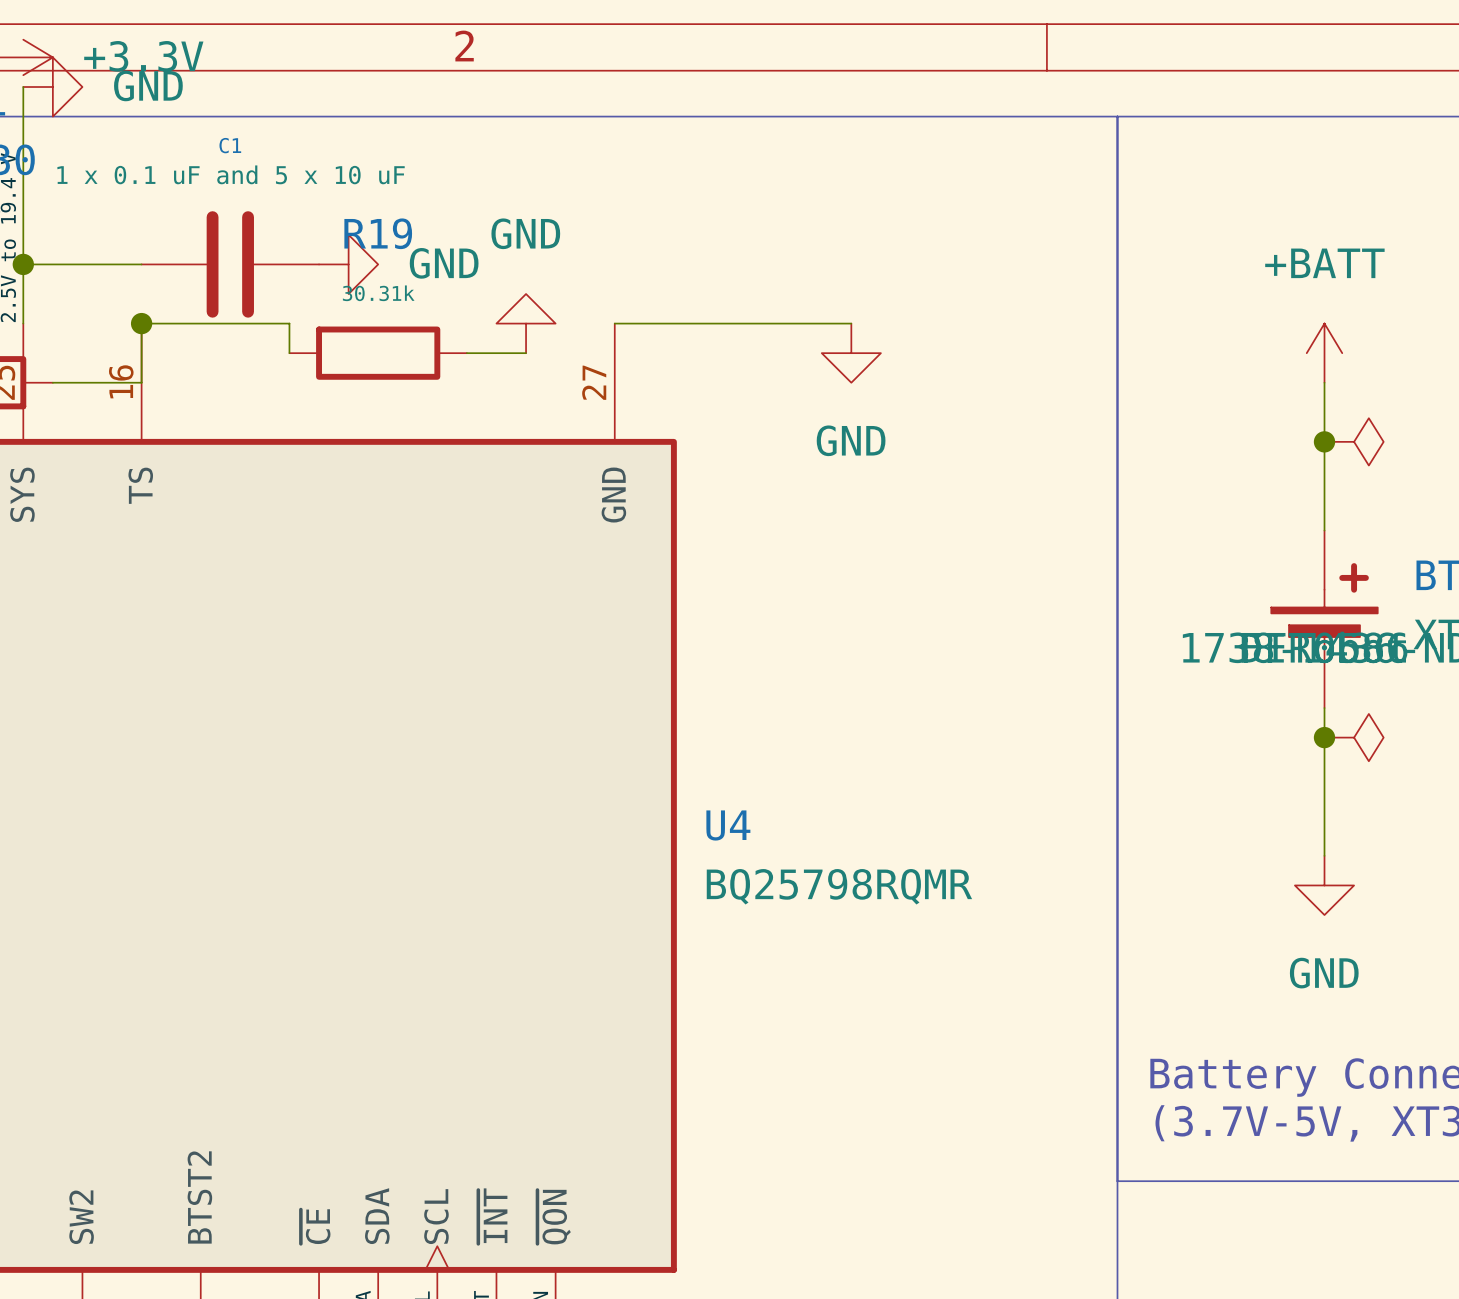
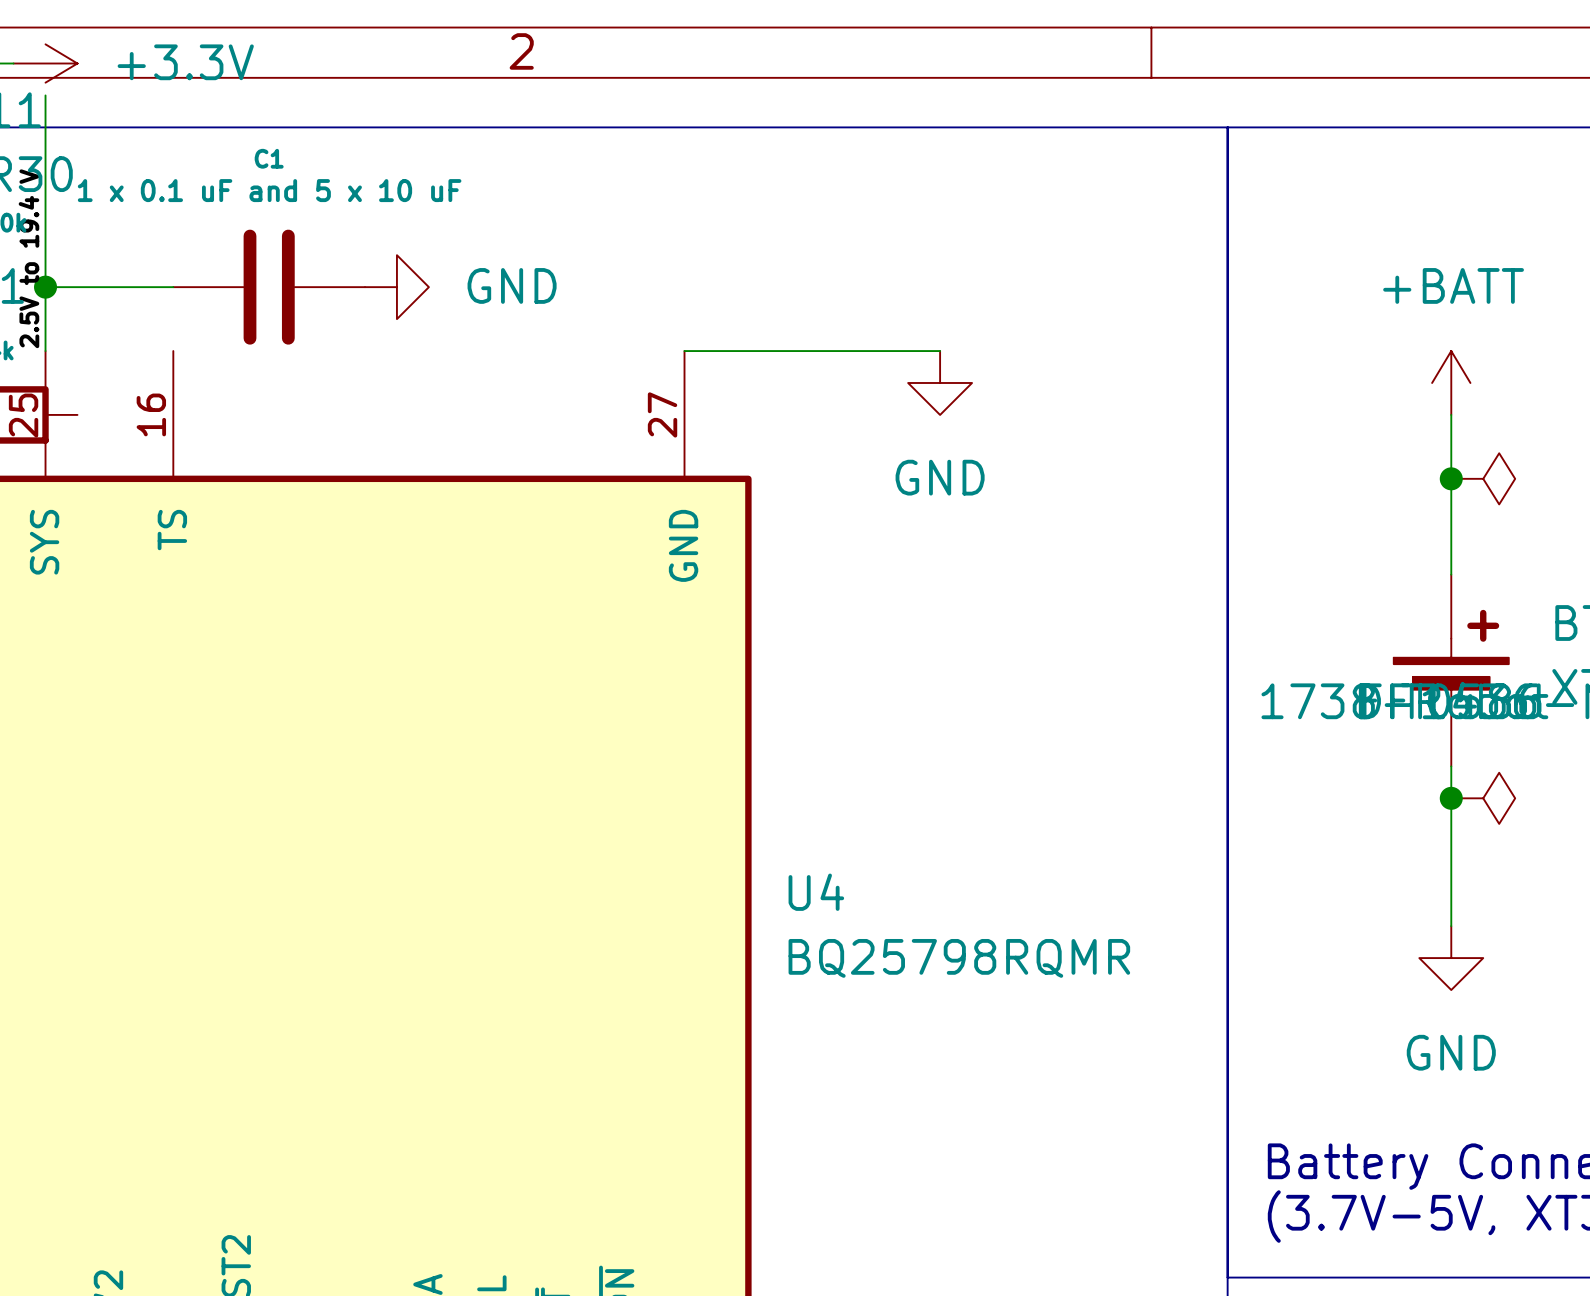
power symbol: GND (52, 87) -> none
junction: (141, 323) -> none
power symbol: GND (526, 323) -> none
wire: (289, 353) (289, 323) (141, 323) (141, 382) (52, 382) -> none
R19: 30.31k (378, 353) -> none
wire: (466, 353) (526, 353) -> none

